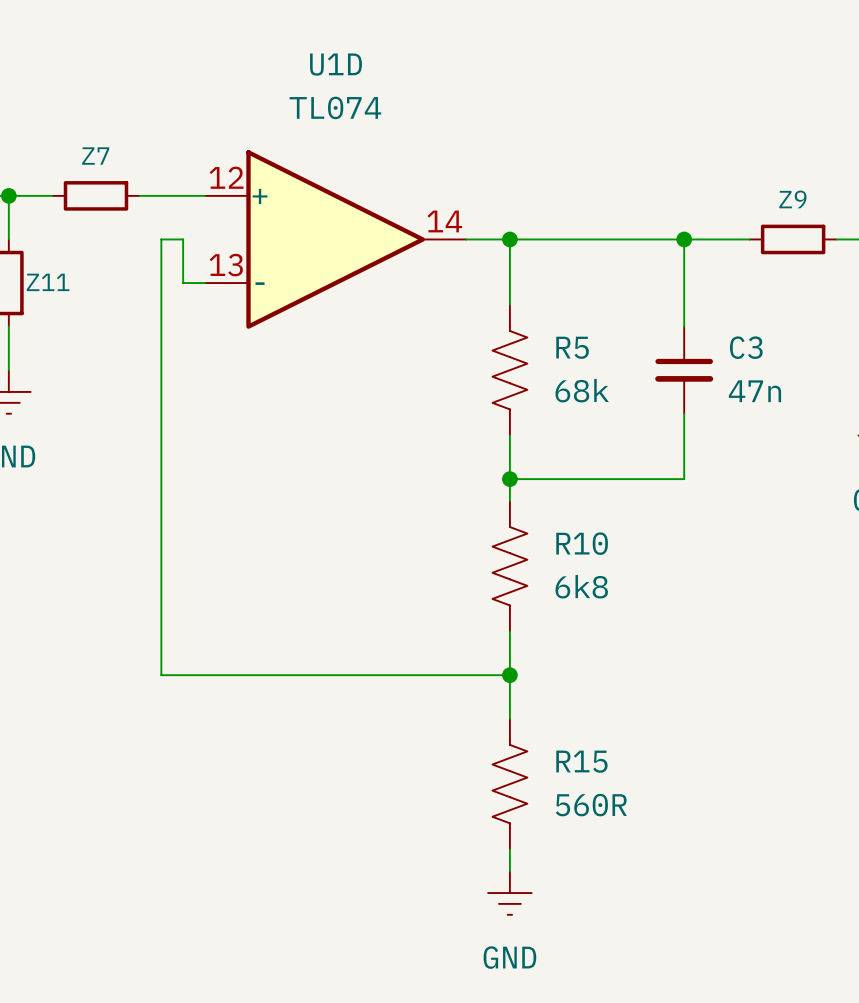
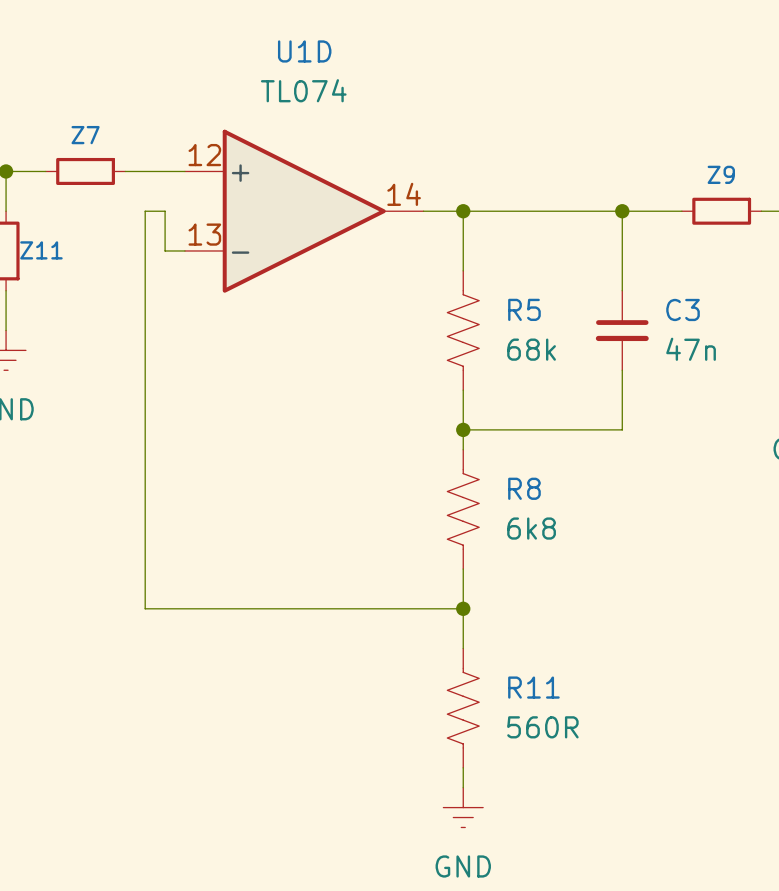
R10 name: R10 (582, 543) -> R8 (524, 488)
R15 name: R15 (581, 761) -> R11 (533, 687)

